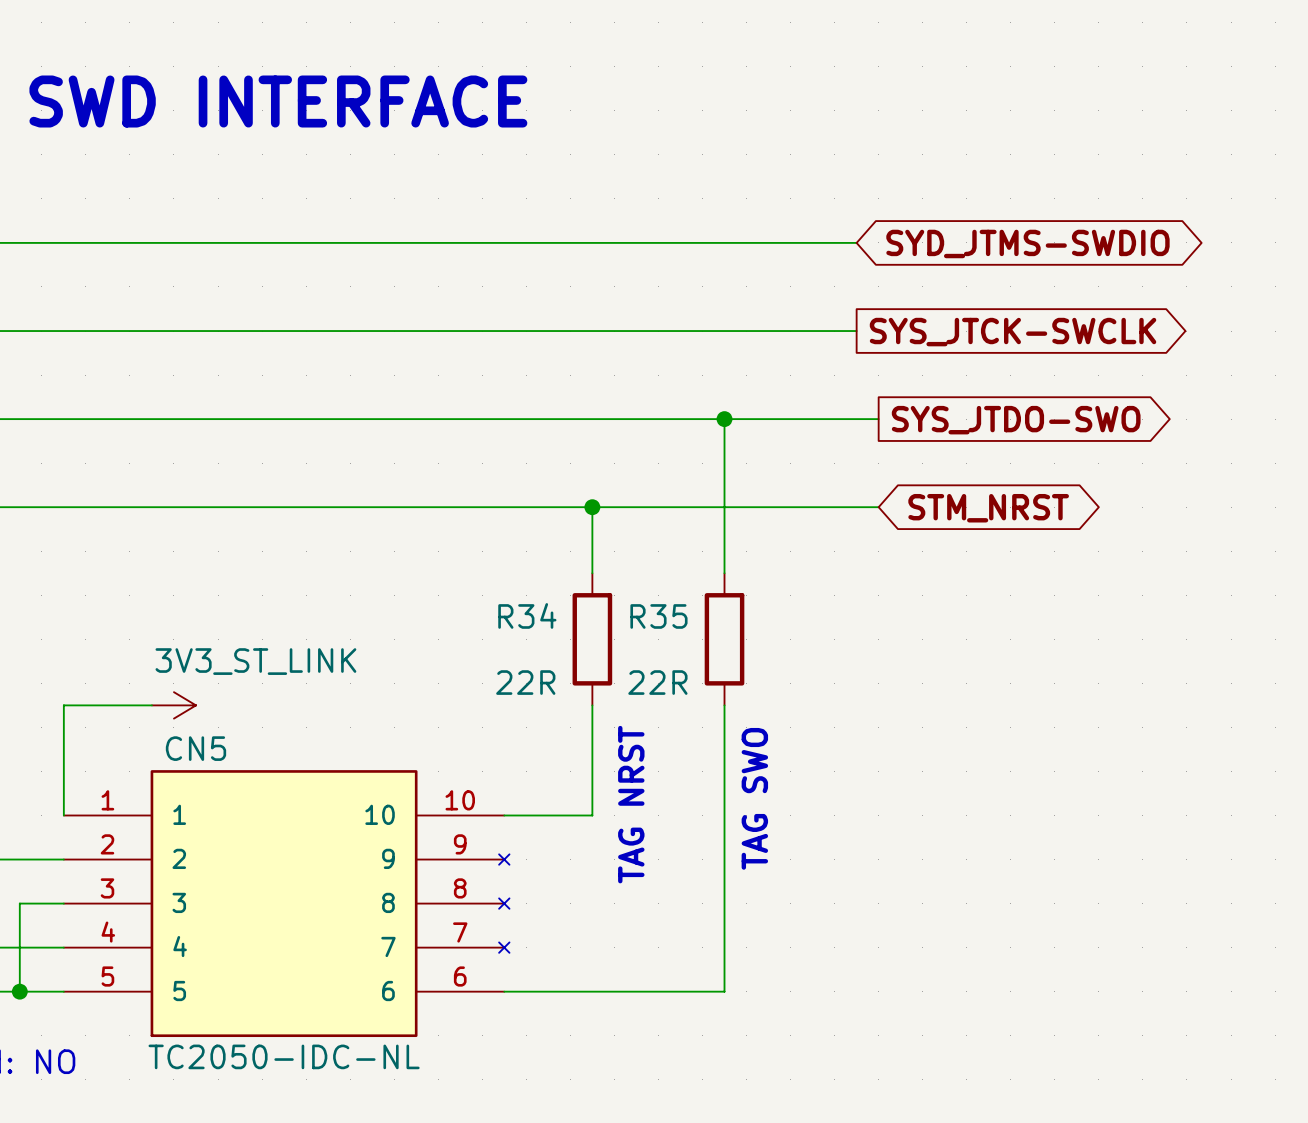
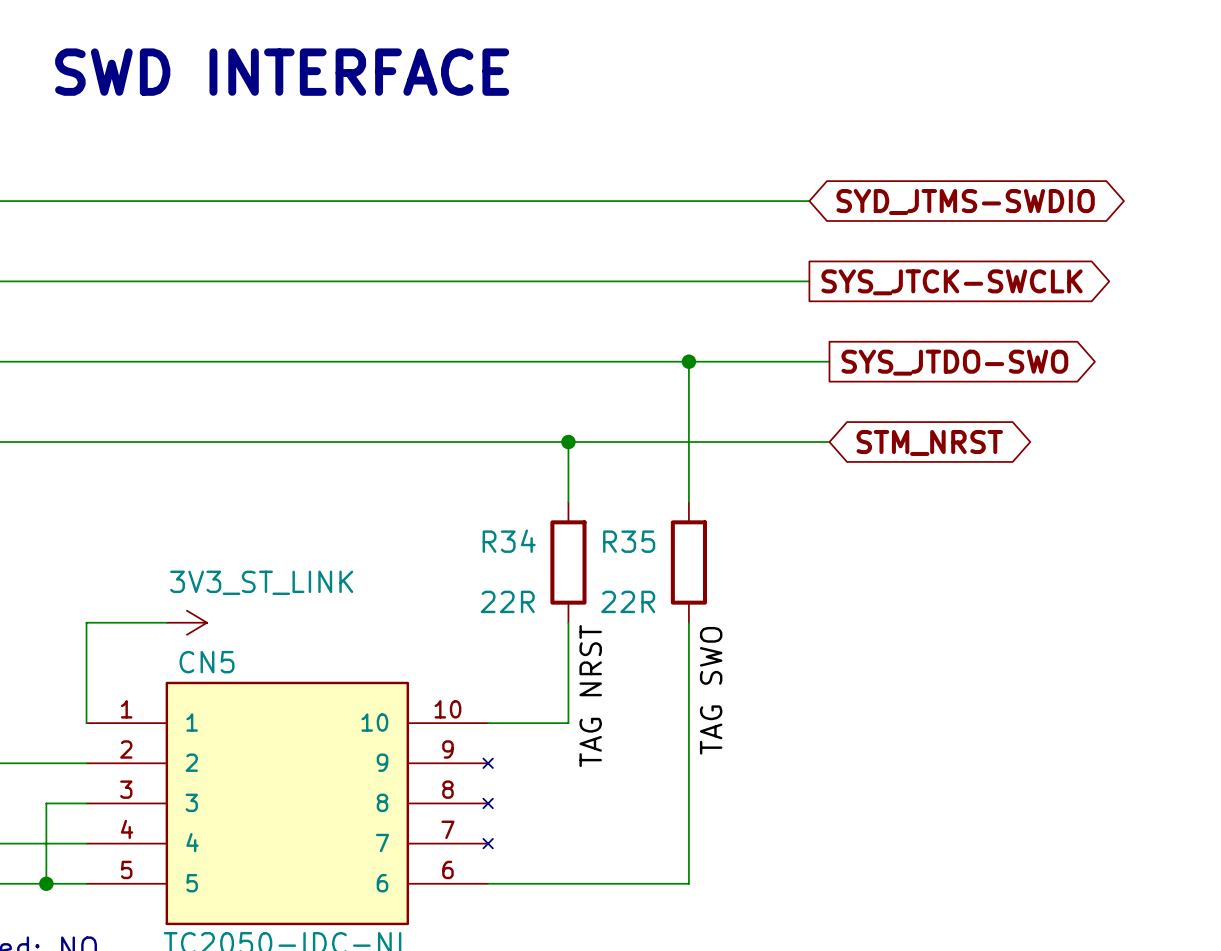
label: none -> TAG SWO (711, 690)
label: none -> TAG NRST (590, 696)
text: TAG SWO (754, 798) -> none
text: TAG NRST (631, 804) -> none

